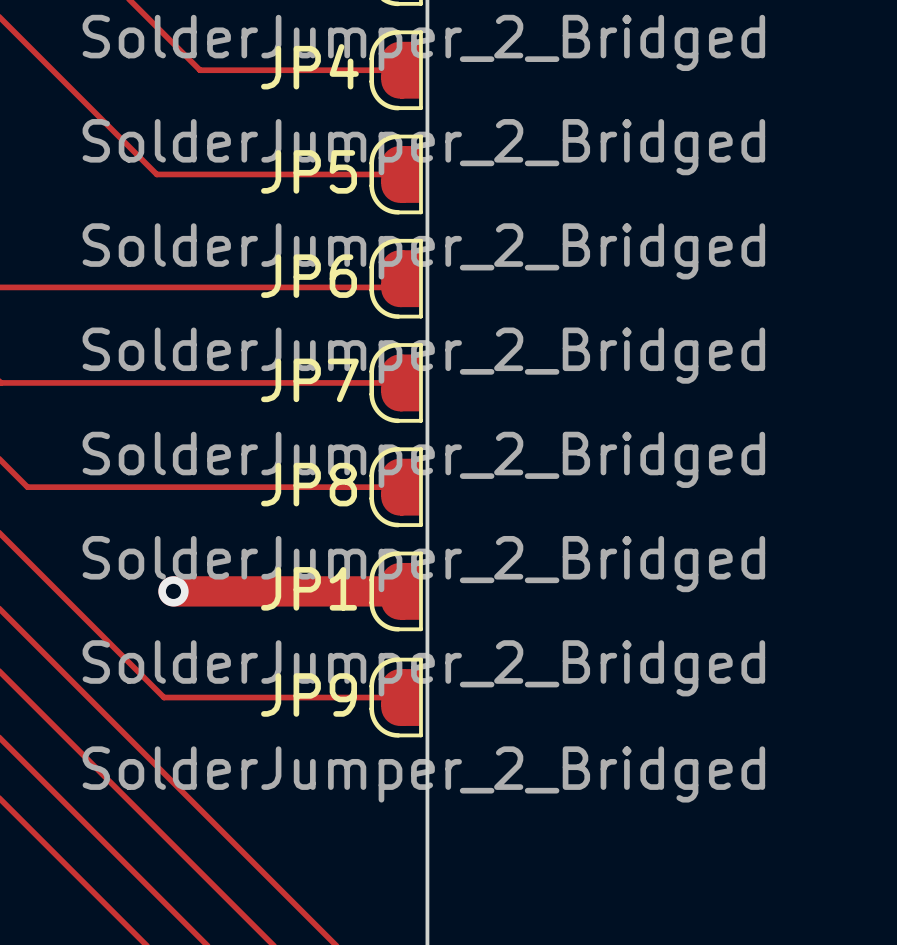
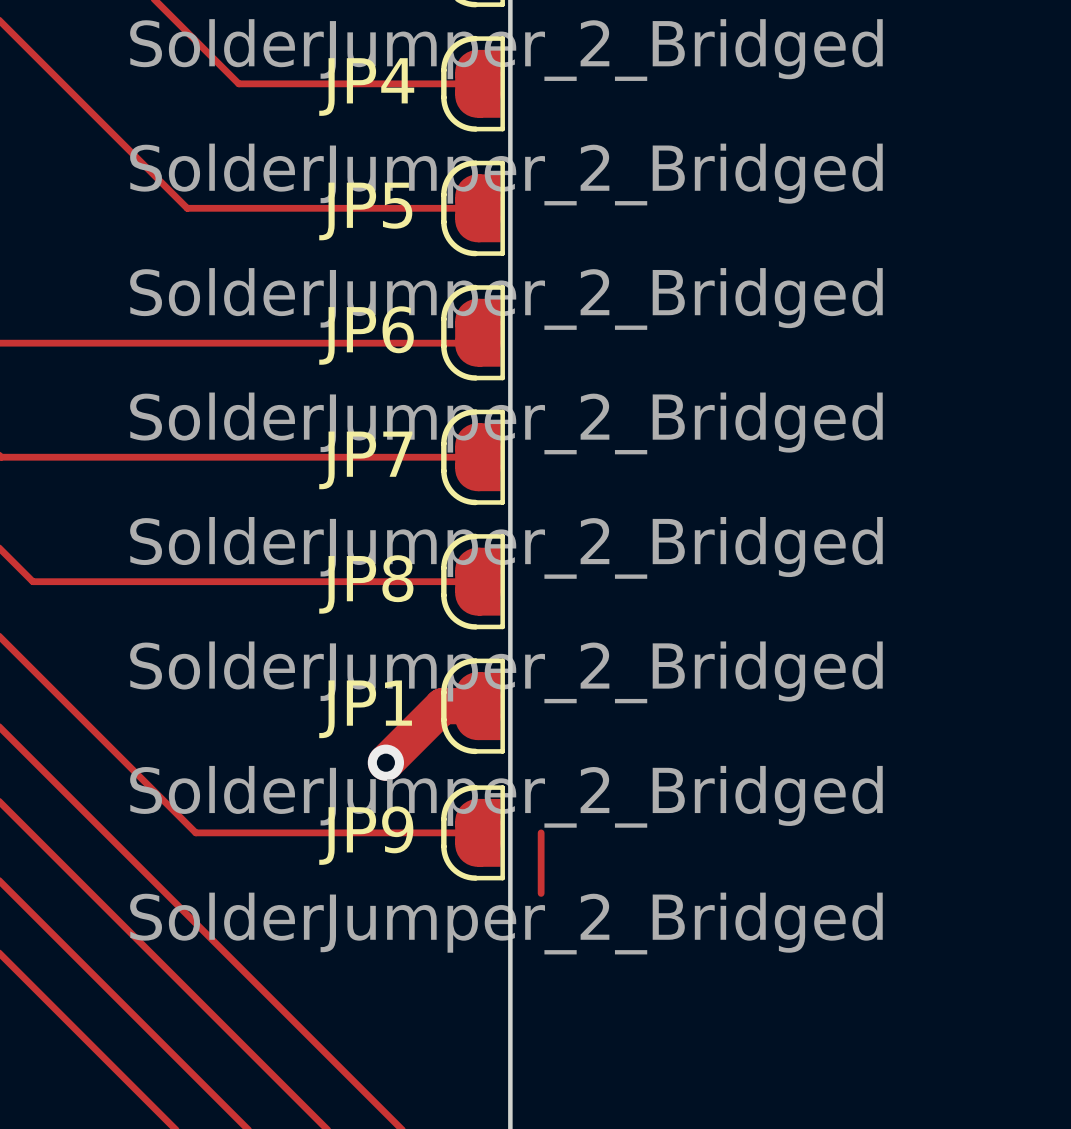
track: (173, 591) (370, 591) -> (385, 762) (442, 706)
via position: (173, 591) -> (385, 762)
track: none -> (541, 832) (541, 893)

